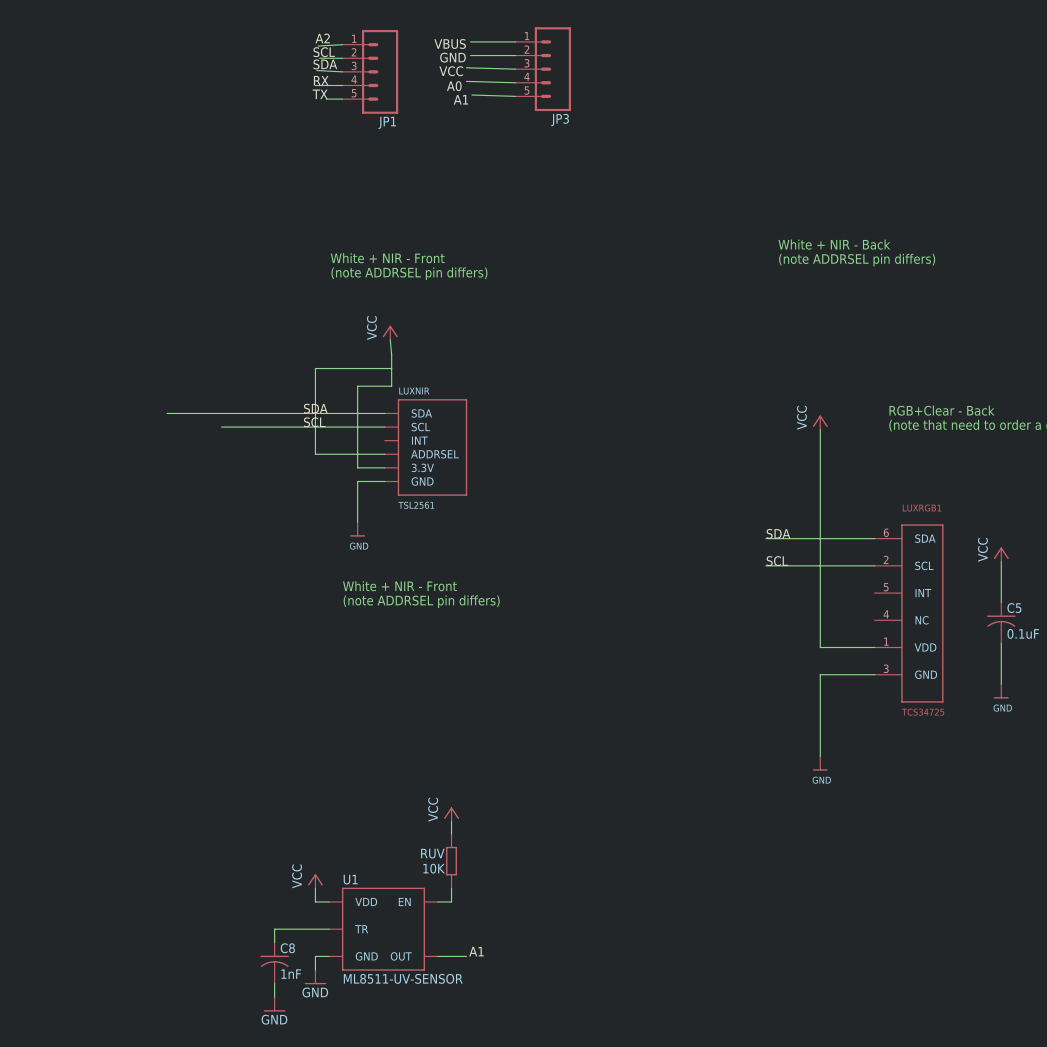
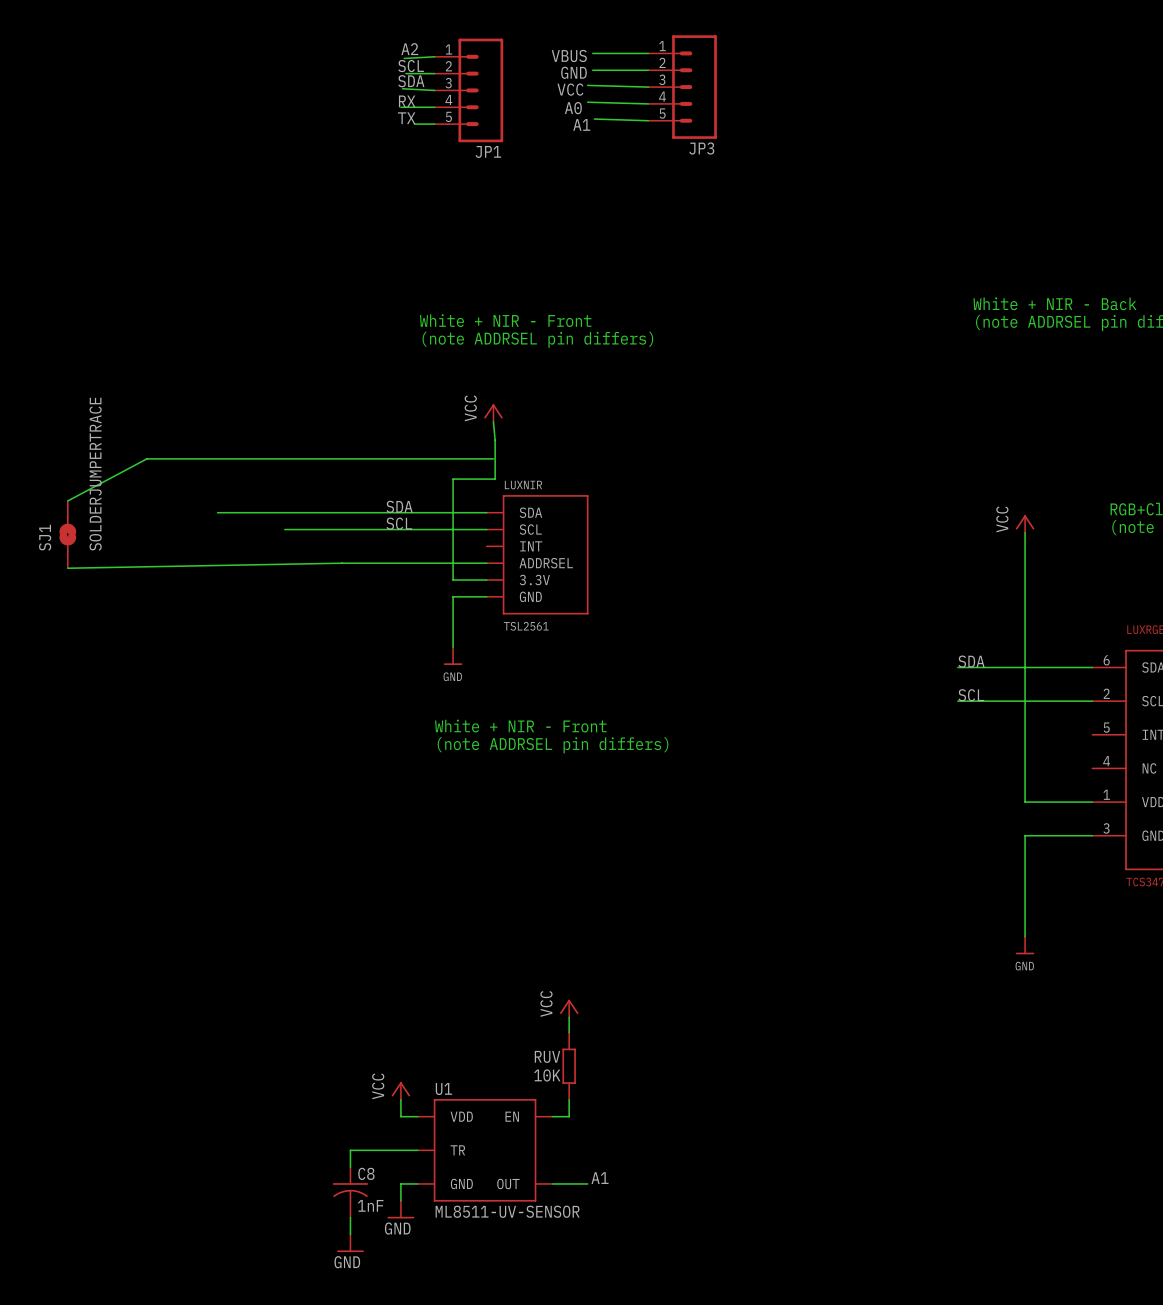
wire: (391, 368) (315, 368) (315, 454) -> (67, 568) (400, 563)
wire: none -> (493, 458) (146, 458) (67, 500)
SJ1: none -> SOLDERJUMPERTRACE (67, 534)

